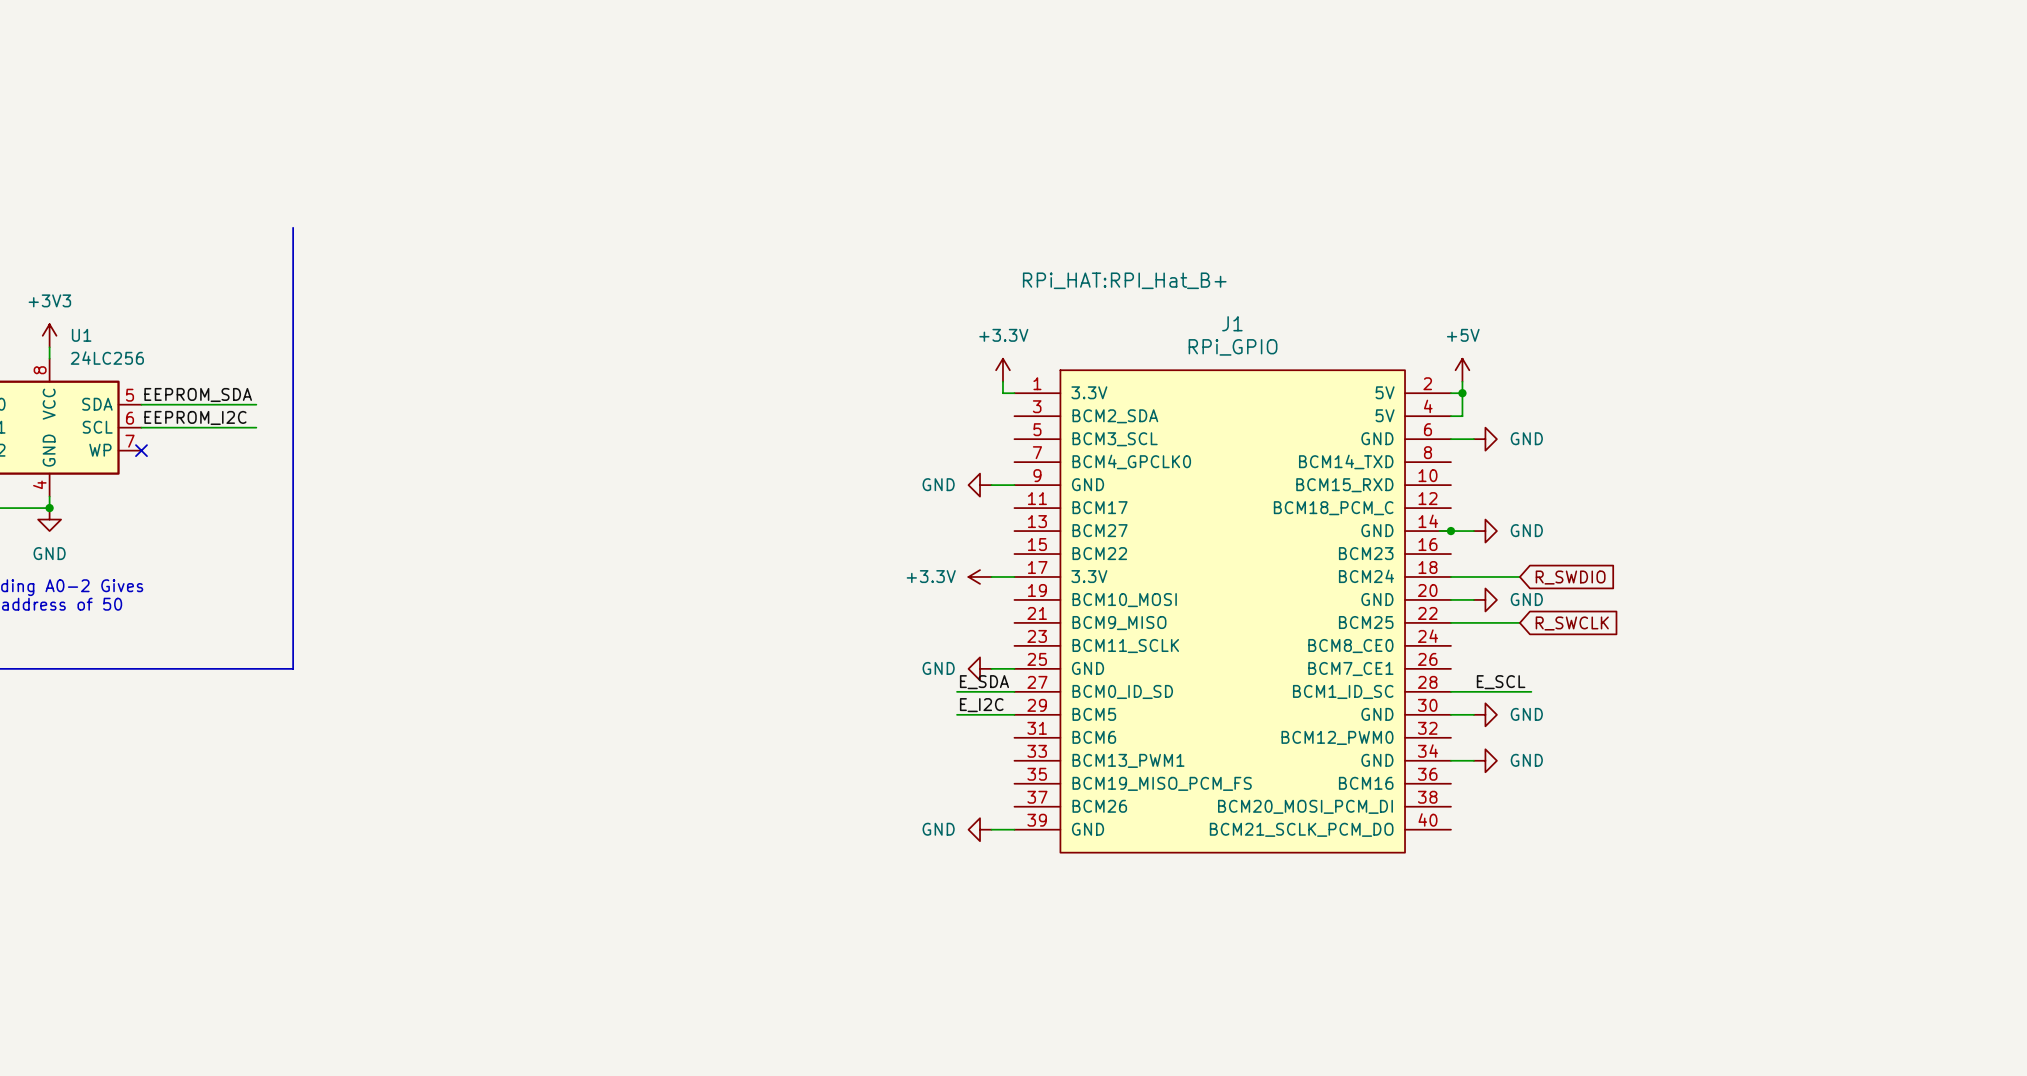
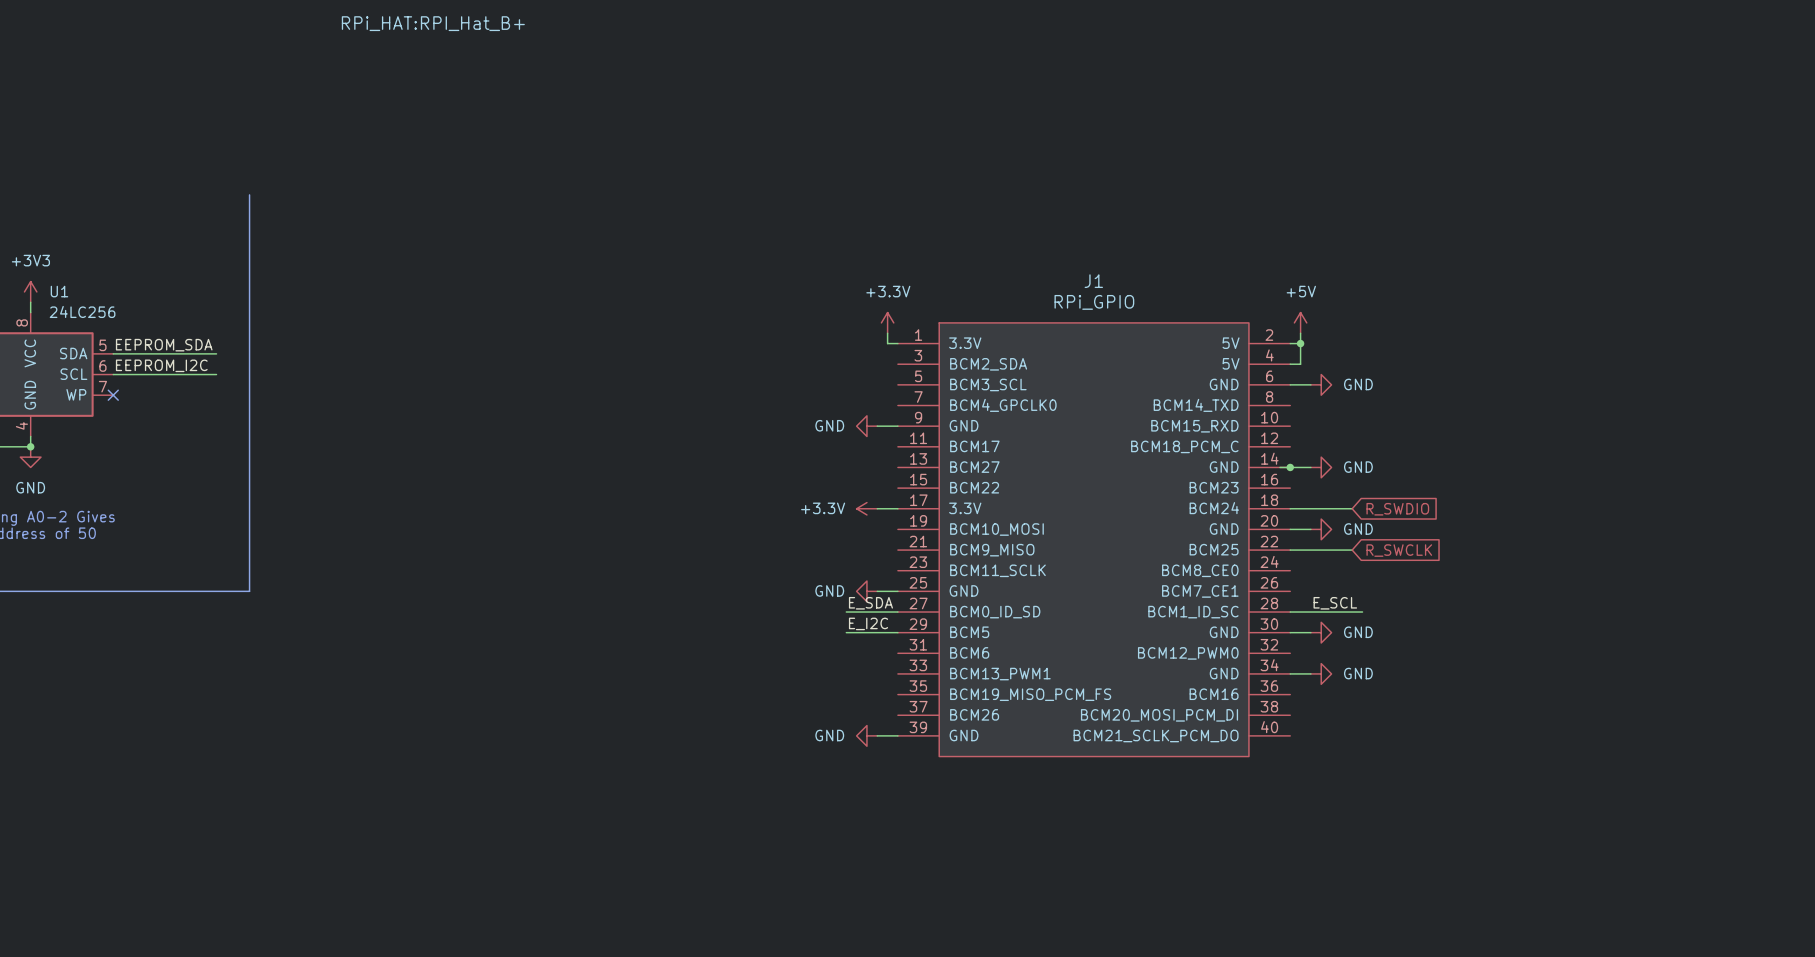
J1 text position: RPi_HAT:RPI_Hat_B+ (1124, 280) -> RPi_HAT:RPI_Hat_B+ (433, 23)

